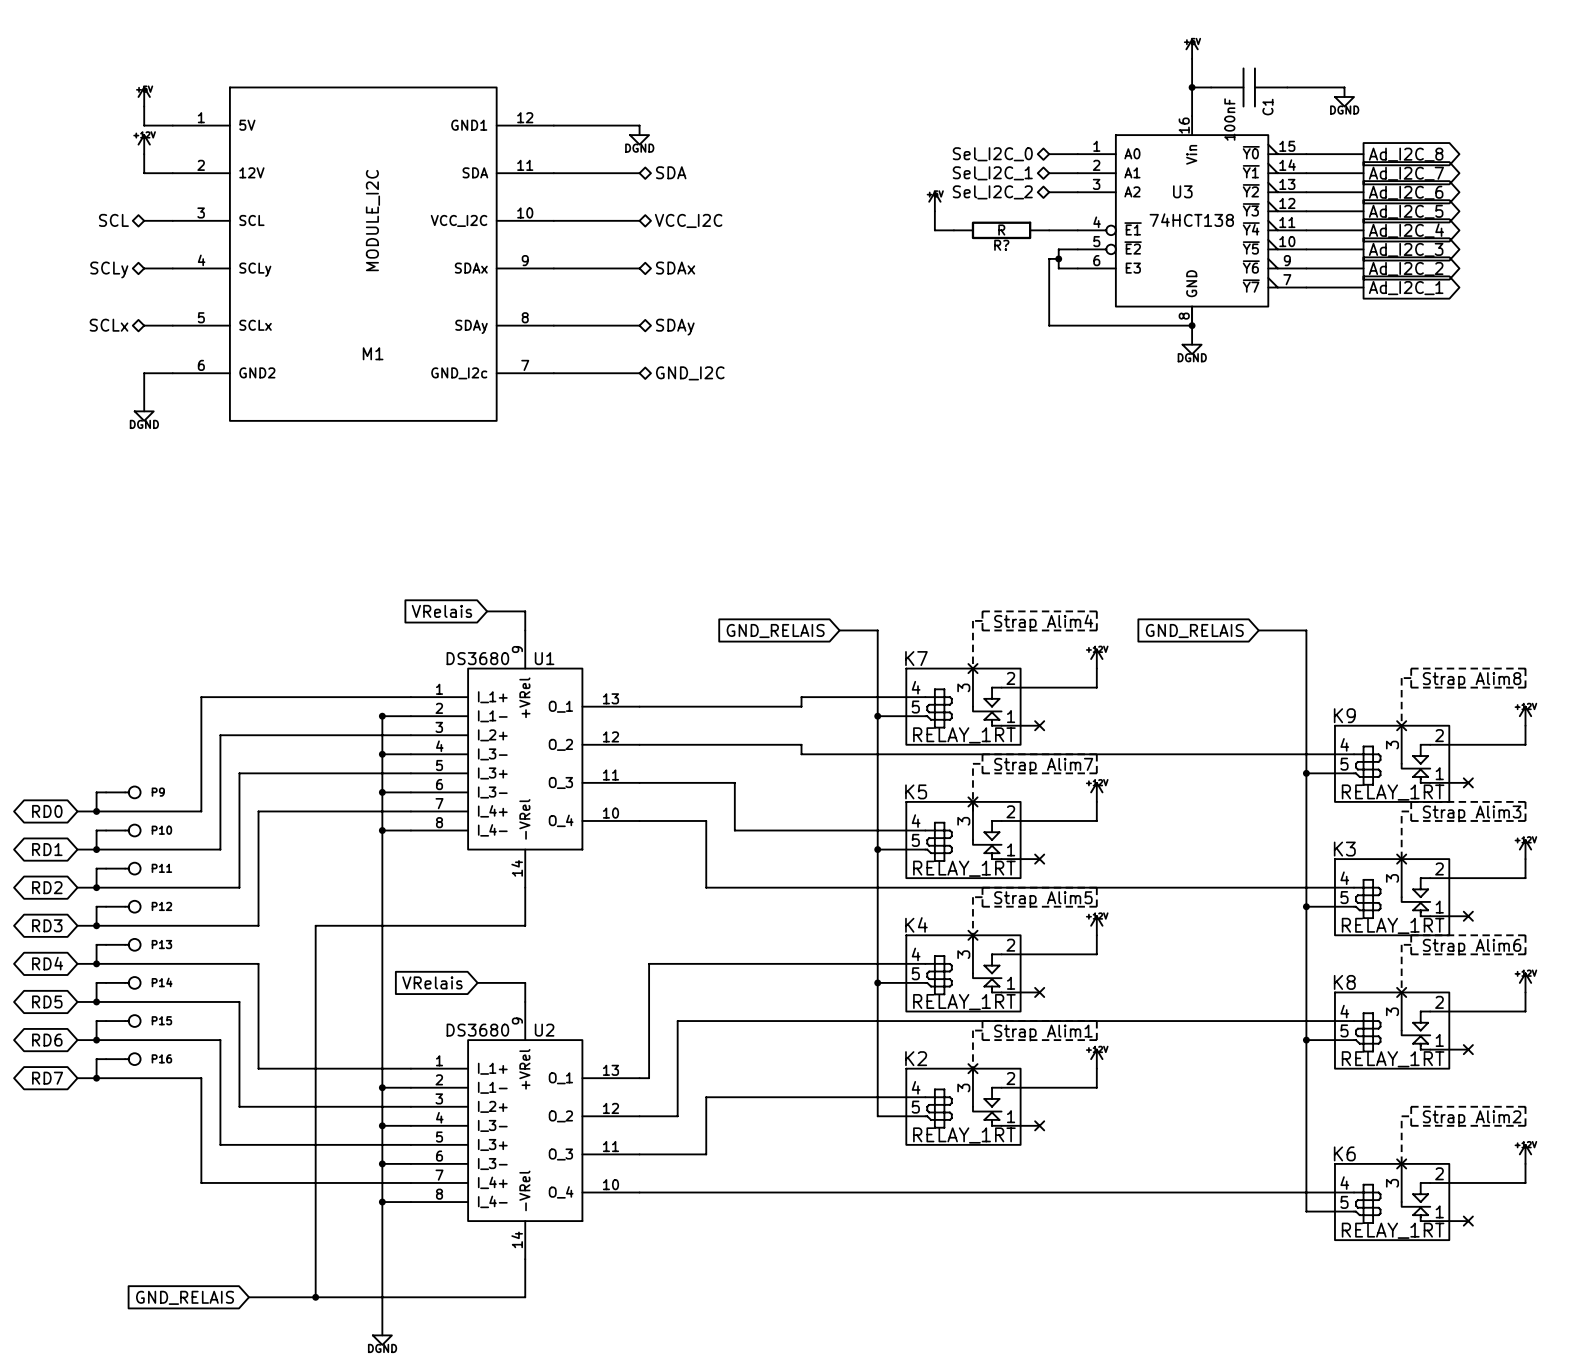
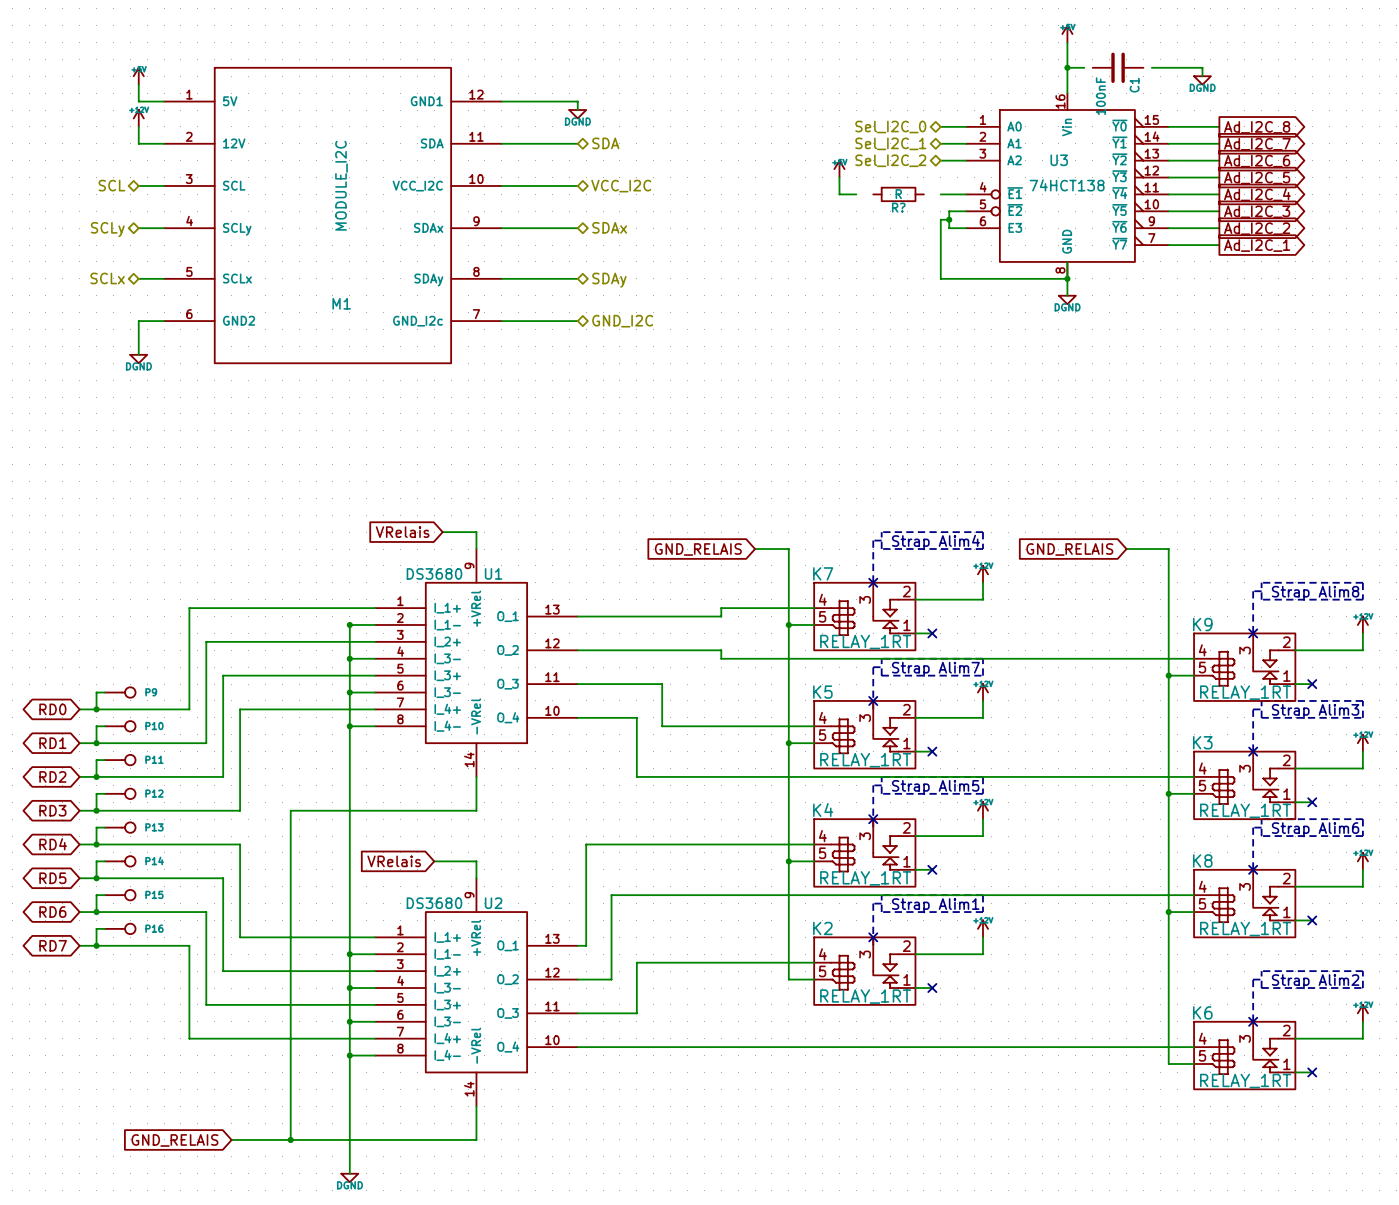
C1 symbol: [1211, 67, 1288, 108] -> [1092, 52, 1144, 83]
R? symbol: [953, 221, 1050, 240] -> [873, 186, 924, 203]

